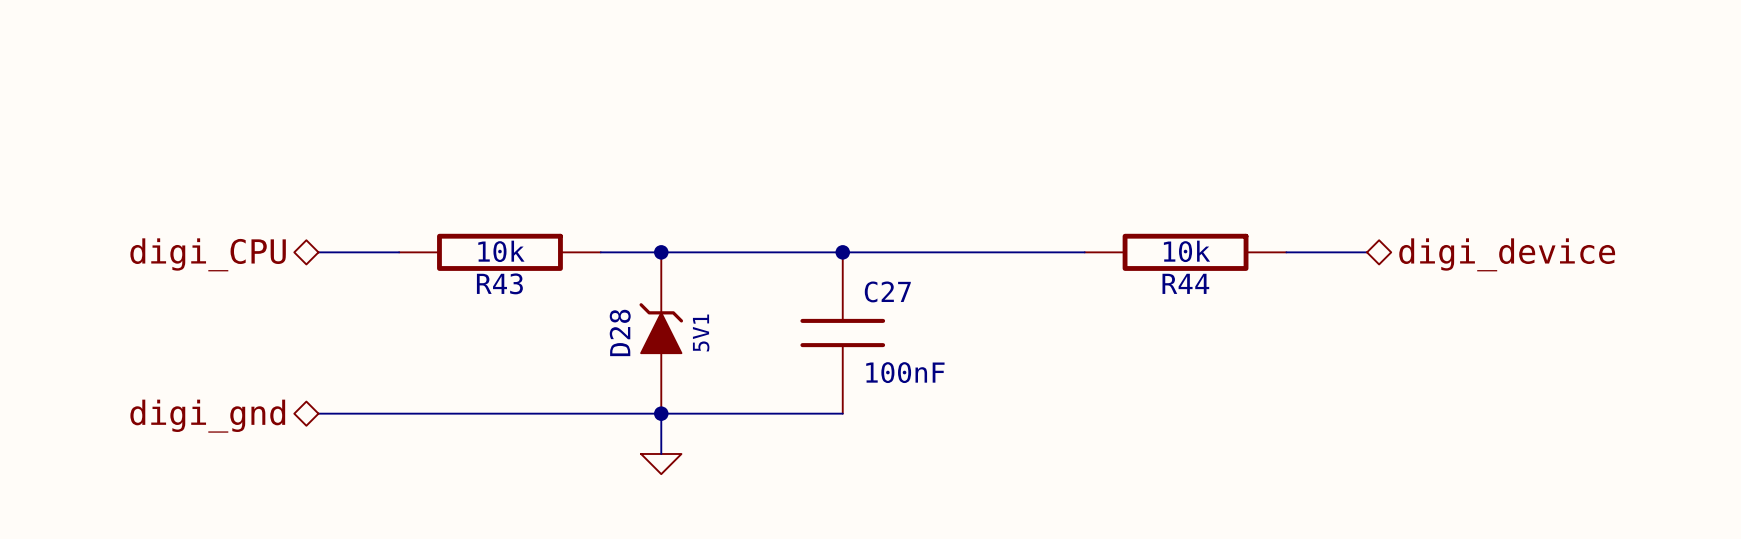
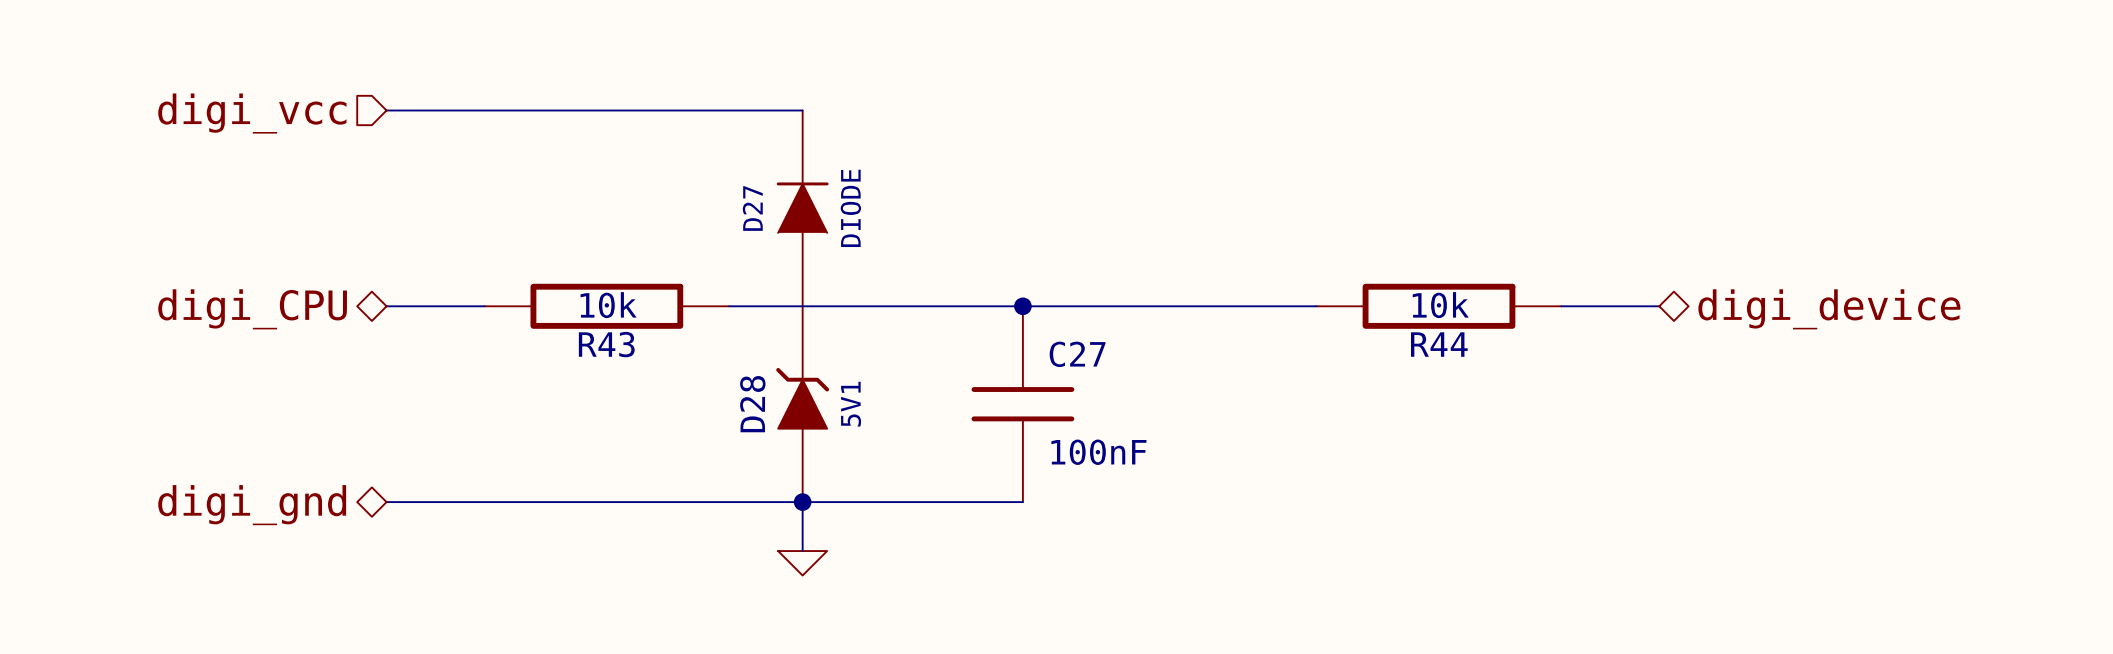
wire: none -> (386, 110) (802, 110)
hierarchical label: none -> digi_vcc (252, 113)
D27: none -> DIODE (802, 208)
junction: (661, 252) -> none

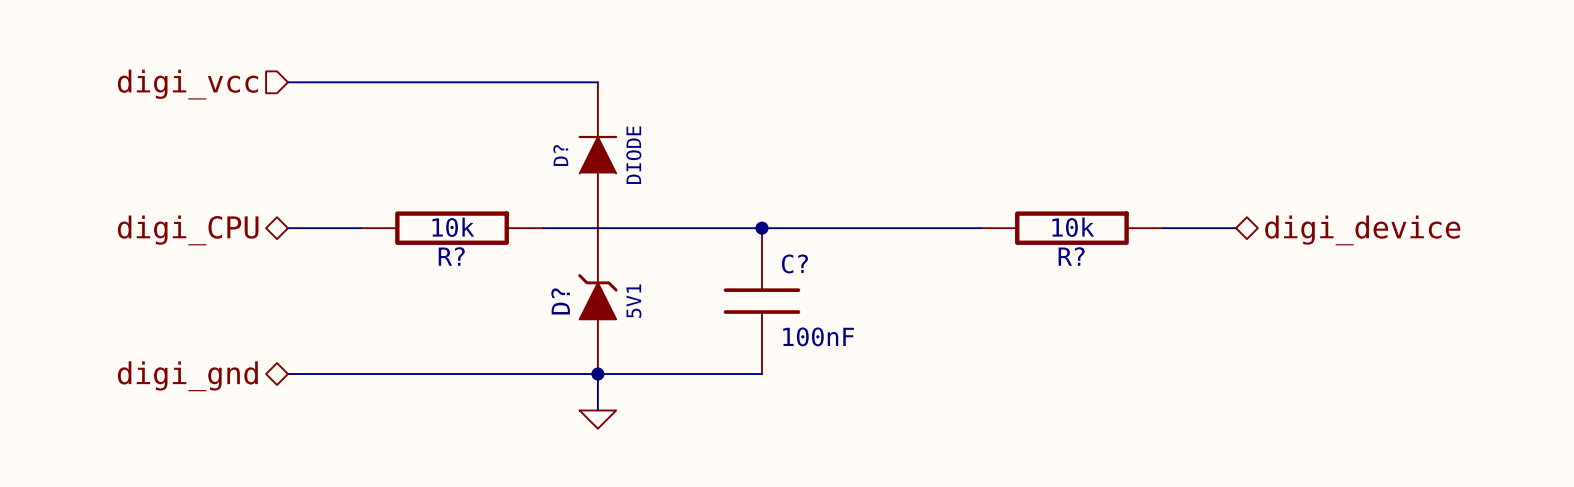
D27 name: D27 (752, 208) -> D? (560, 155)
R43 name: R43 (606, 344) -> R? (451, 256)
R44 name: R44 (1439, 344) -> R? (1071, 256)
C27 name: C27 (1077, 354) -> C? (794, 263)
D28 name: D28 (752, 404) -> D? (560, 301)

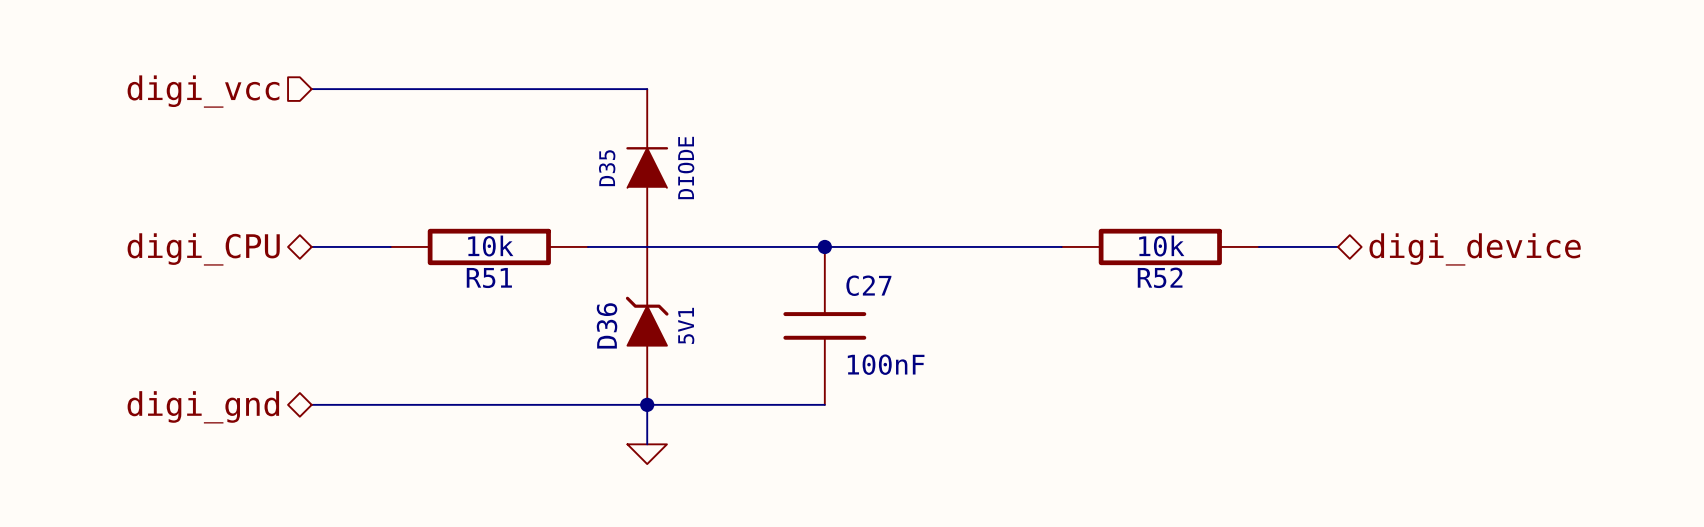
D? name: D? (560, 155) -> D35 (607, 168)
R? name: R? (451, 256) -> R51 (489, 278)
R? name: R? (1071, 256) -> R52 (1160, 277)
C? name: C? (794, 263) -> C27 (868, 285)
D? name: D? (560, 301) -> D36 (607, 325)

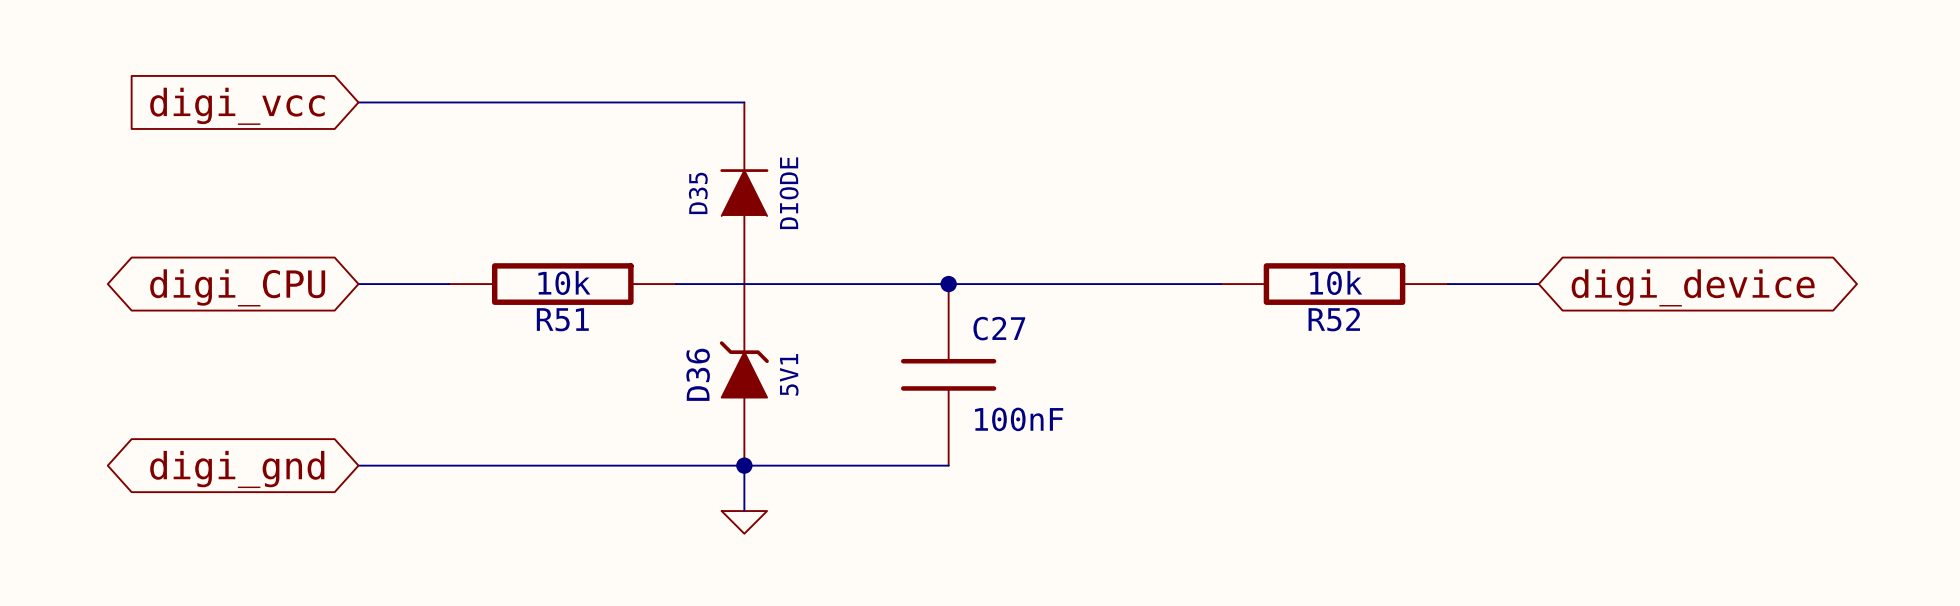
hierarchical label: digi_vcc (203, 91) -> none
global label: none -> digi_vcc (237, 106)
hierarchical label: digi_CPU (203, 249) -> none
hierarchical label: digi_device (1475, 249) -> none
global label: none -> digi_CPU (237, 287)
global label: none -> digi_device (1693, 287)
hierarchical label: digi_gnd (203, 407) -> none
global label: none -> digi_gnd (237, 469)

